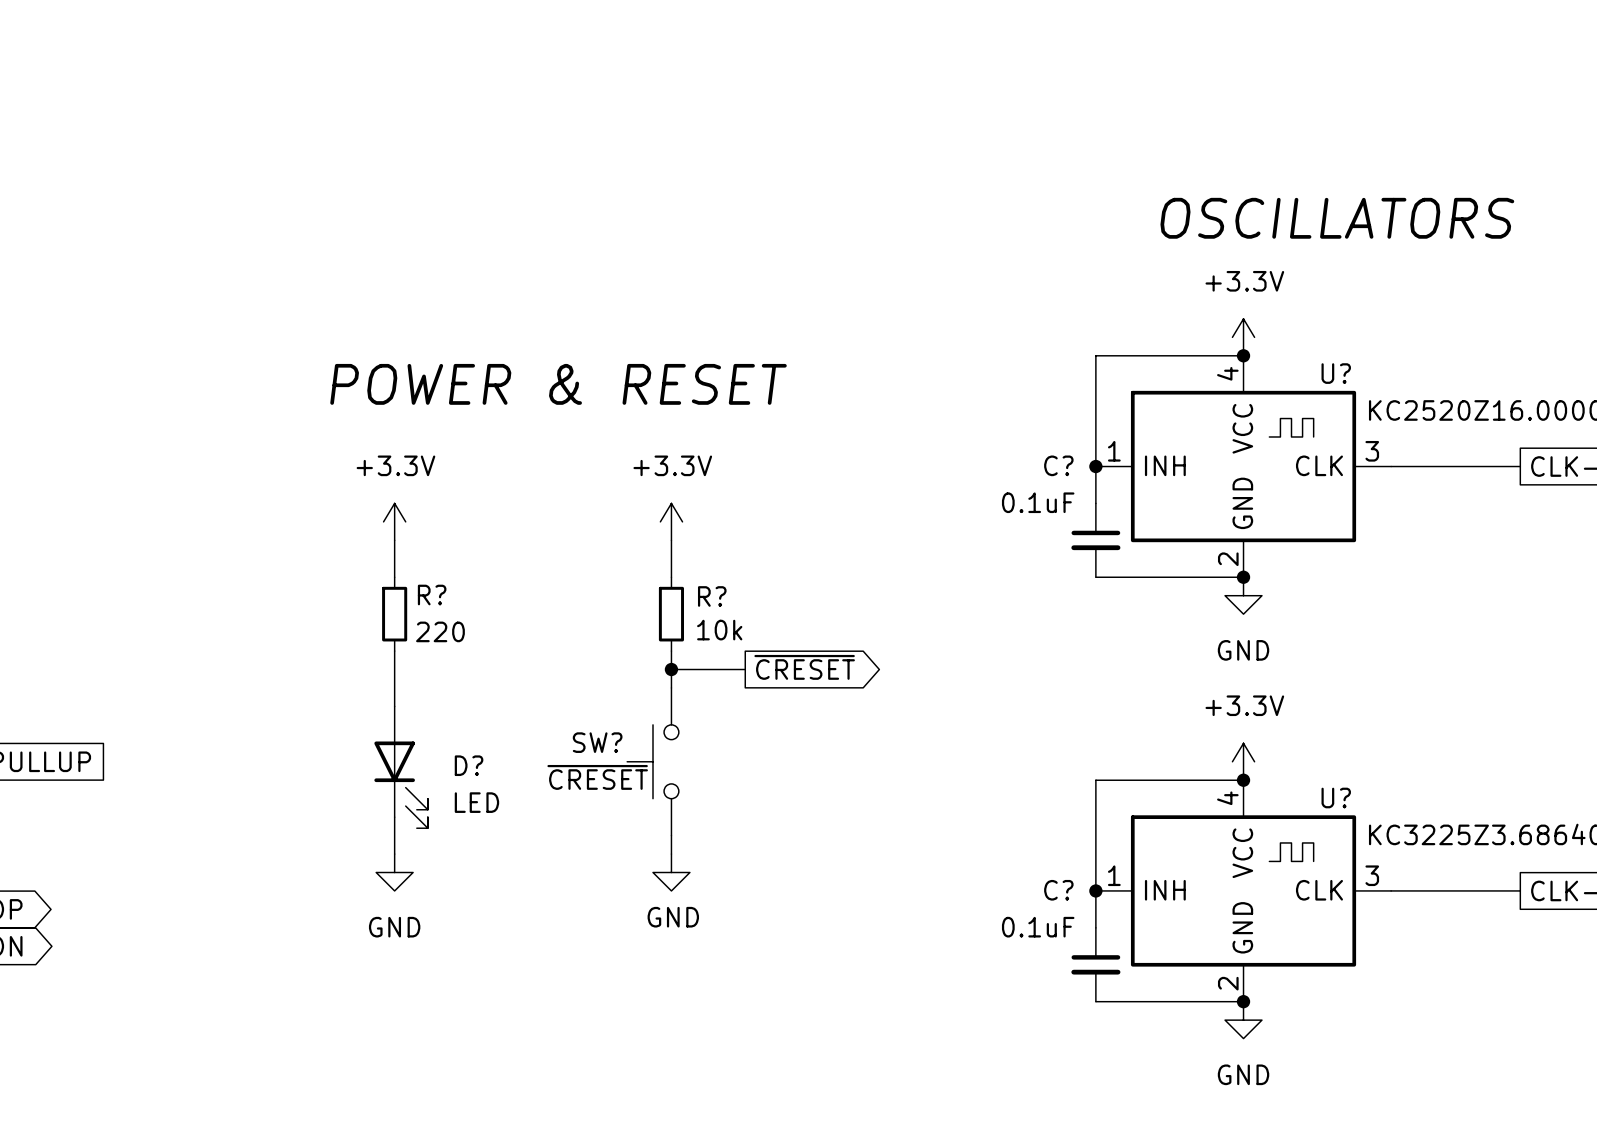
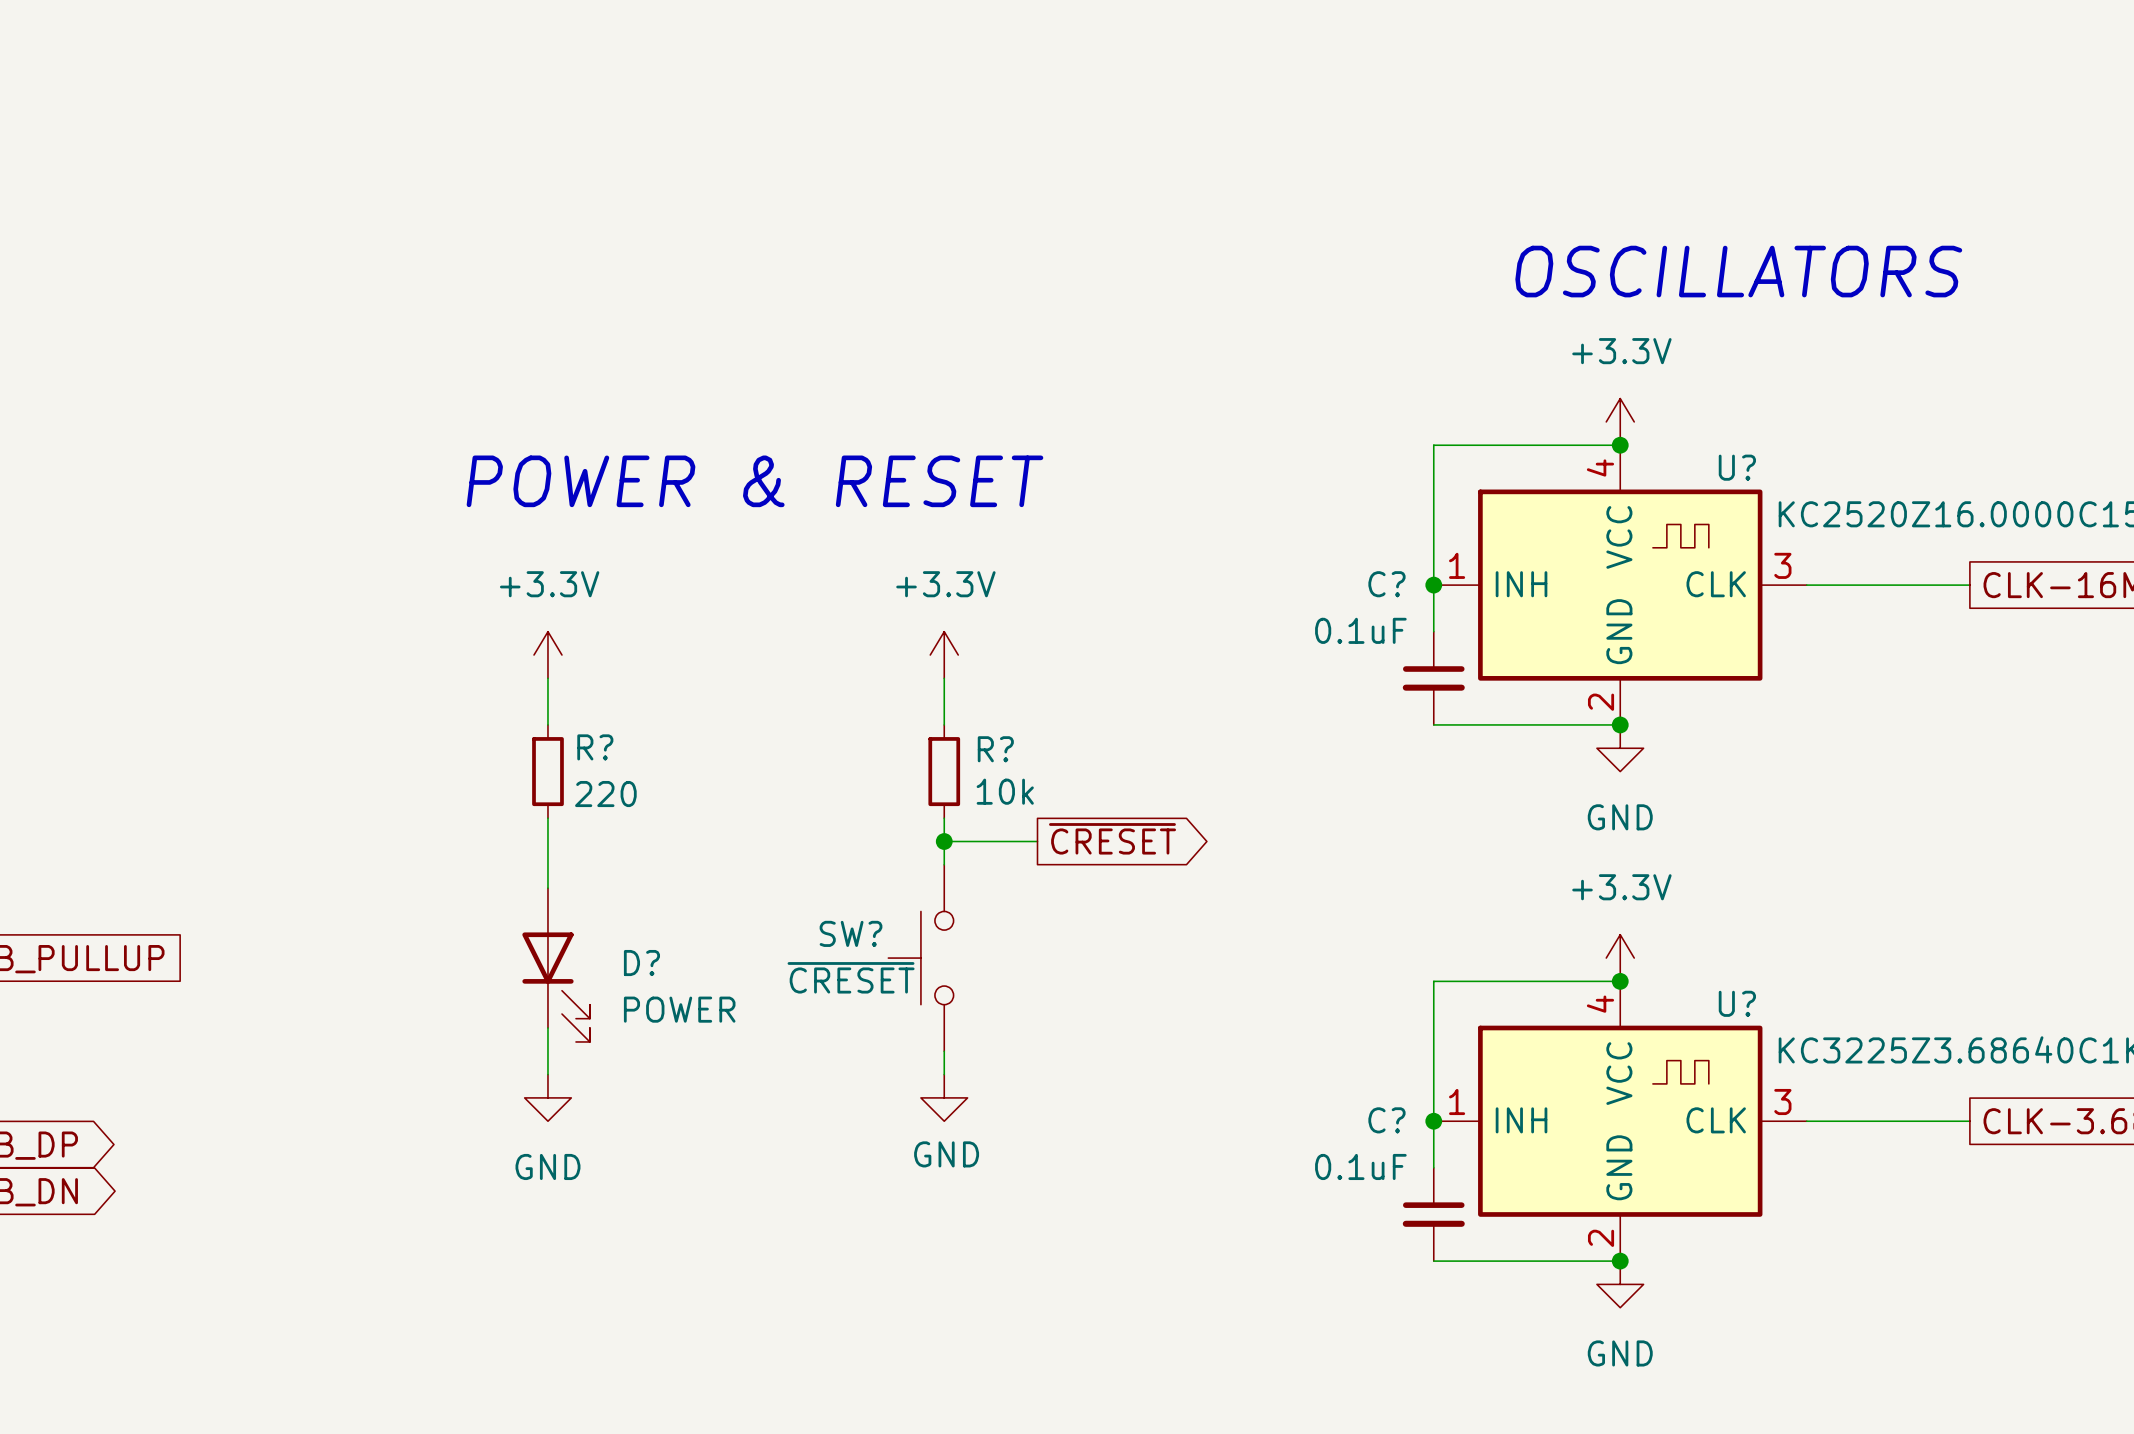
power symbol position: +3.3V (671, 521) -> +3.3V (944, 655)
wire: (671, 540) (671, 577) -> (944, 678) (944, 724)
R? position: (671, 614) -> (944, 771)
wire: (671, 651) (671, 687) -> (944, 818) (944, 864)
global label position: ~{CRESET} (804, 667) -> ~{CRESET} (1112, 838)
wire: (671, 669) (708, 669) -> (990, 841) (1037, 841)
junction position: (671, 669) -> (944, 841)
SW? position: (653, 761) -> (920, 958)
D? value: LED (476, 802) -> POWER (679, 1009)
wire: (671, 835) (671, 854) -> (944, 1051) (944, 1074)
power symbol position: GND (671, 872) -> GND (944, 1097)

